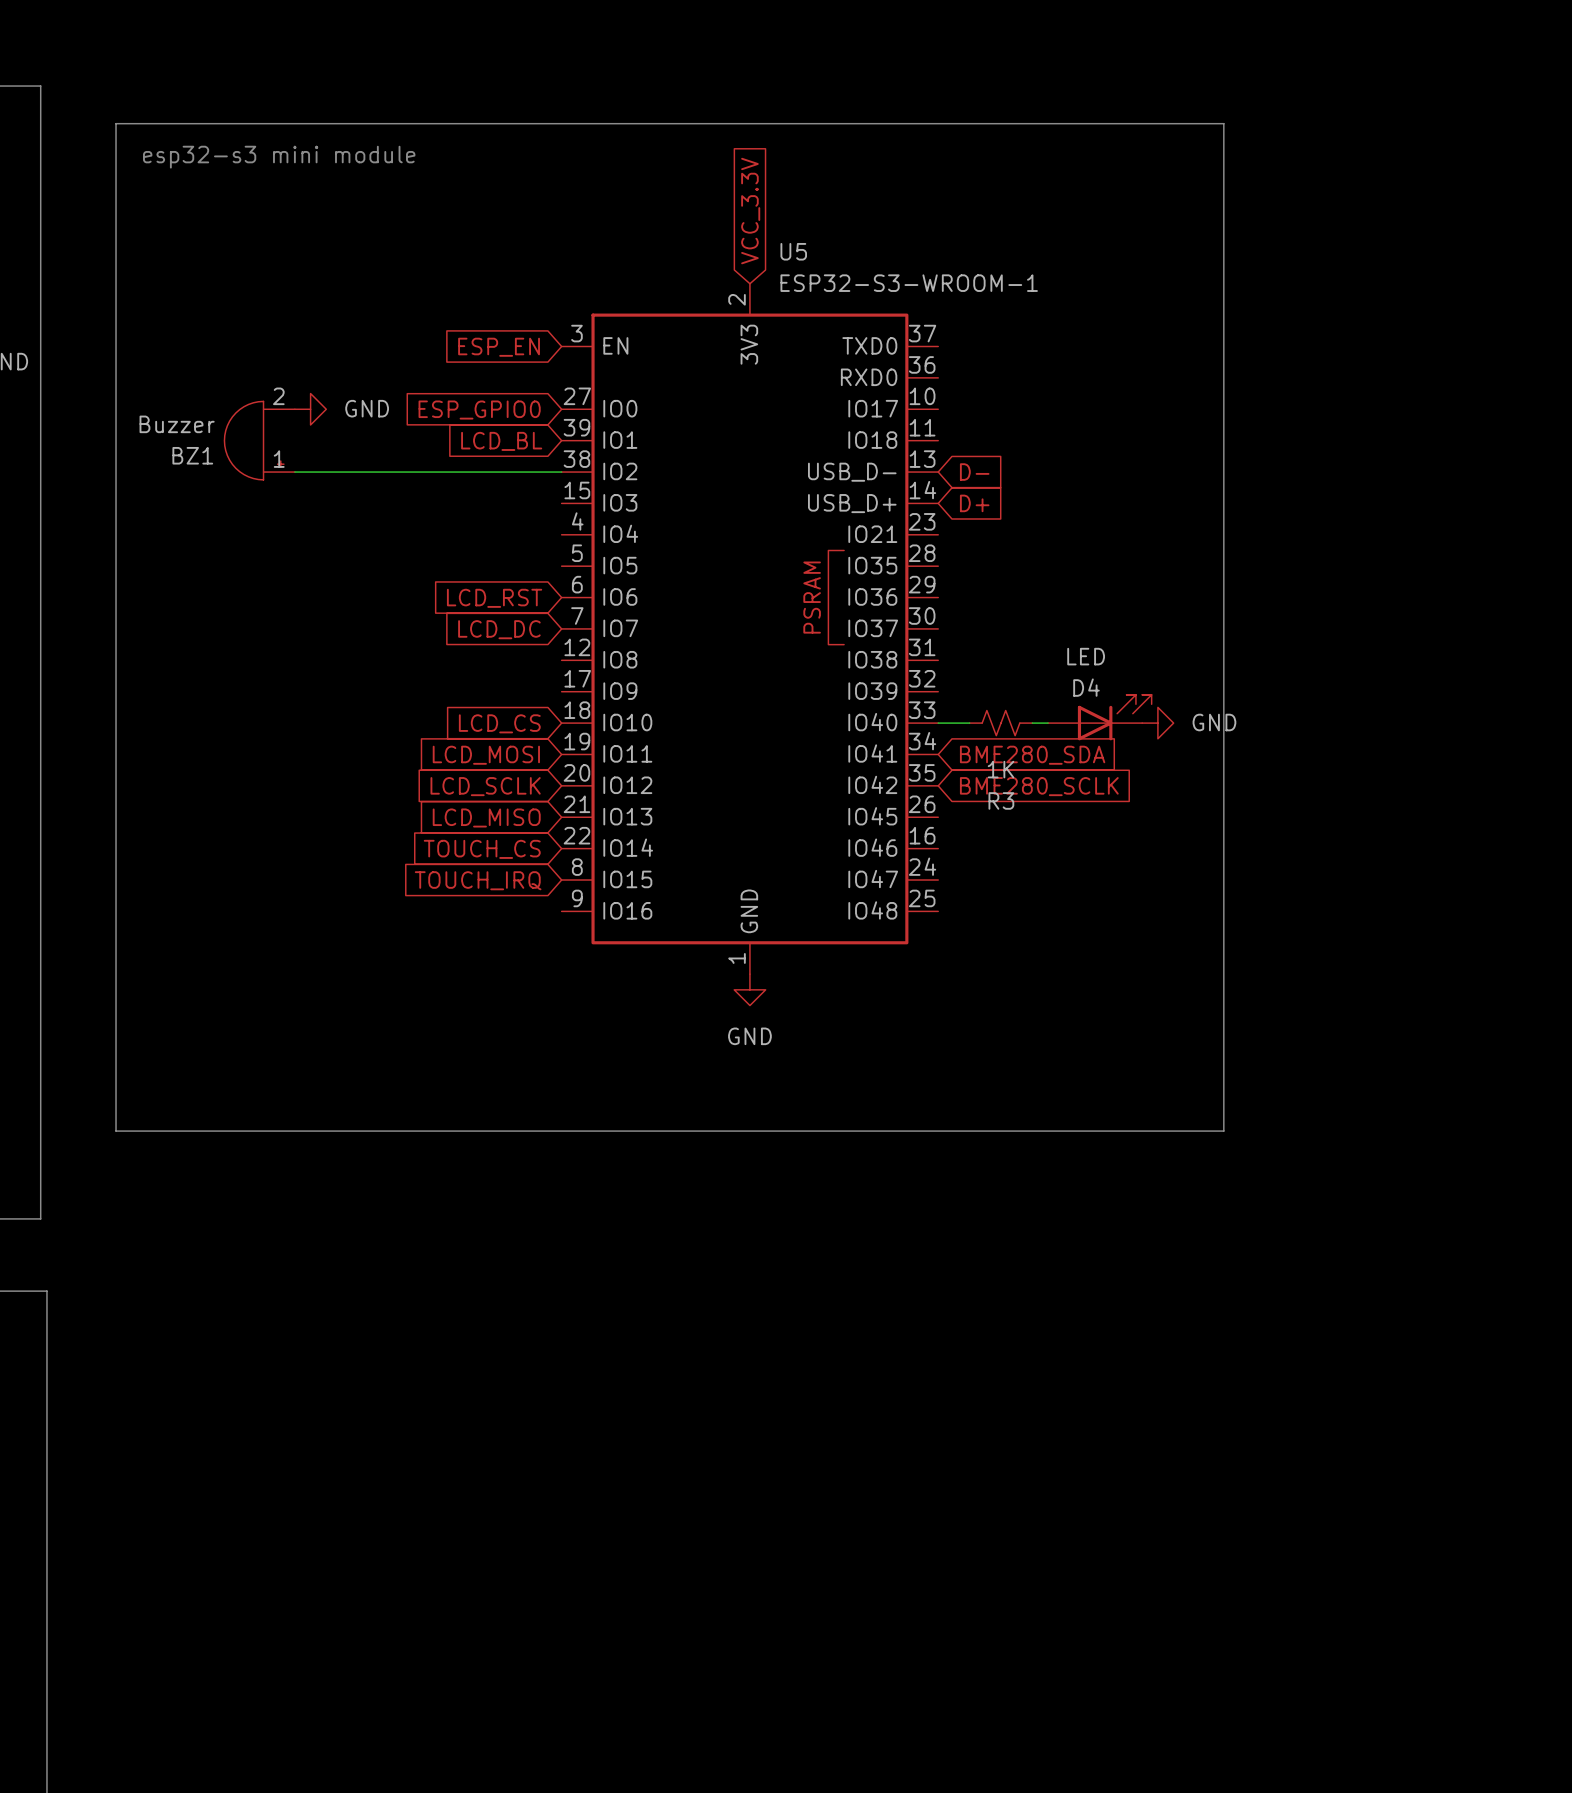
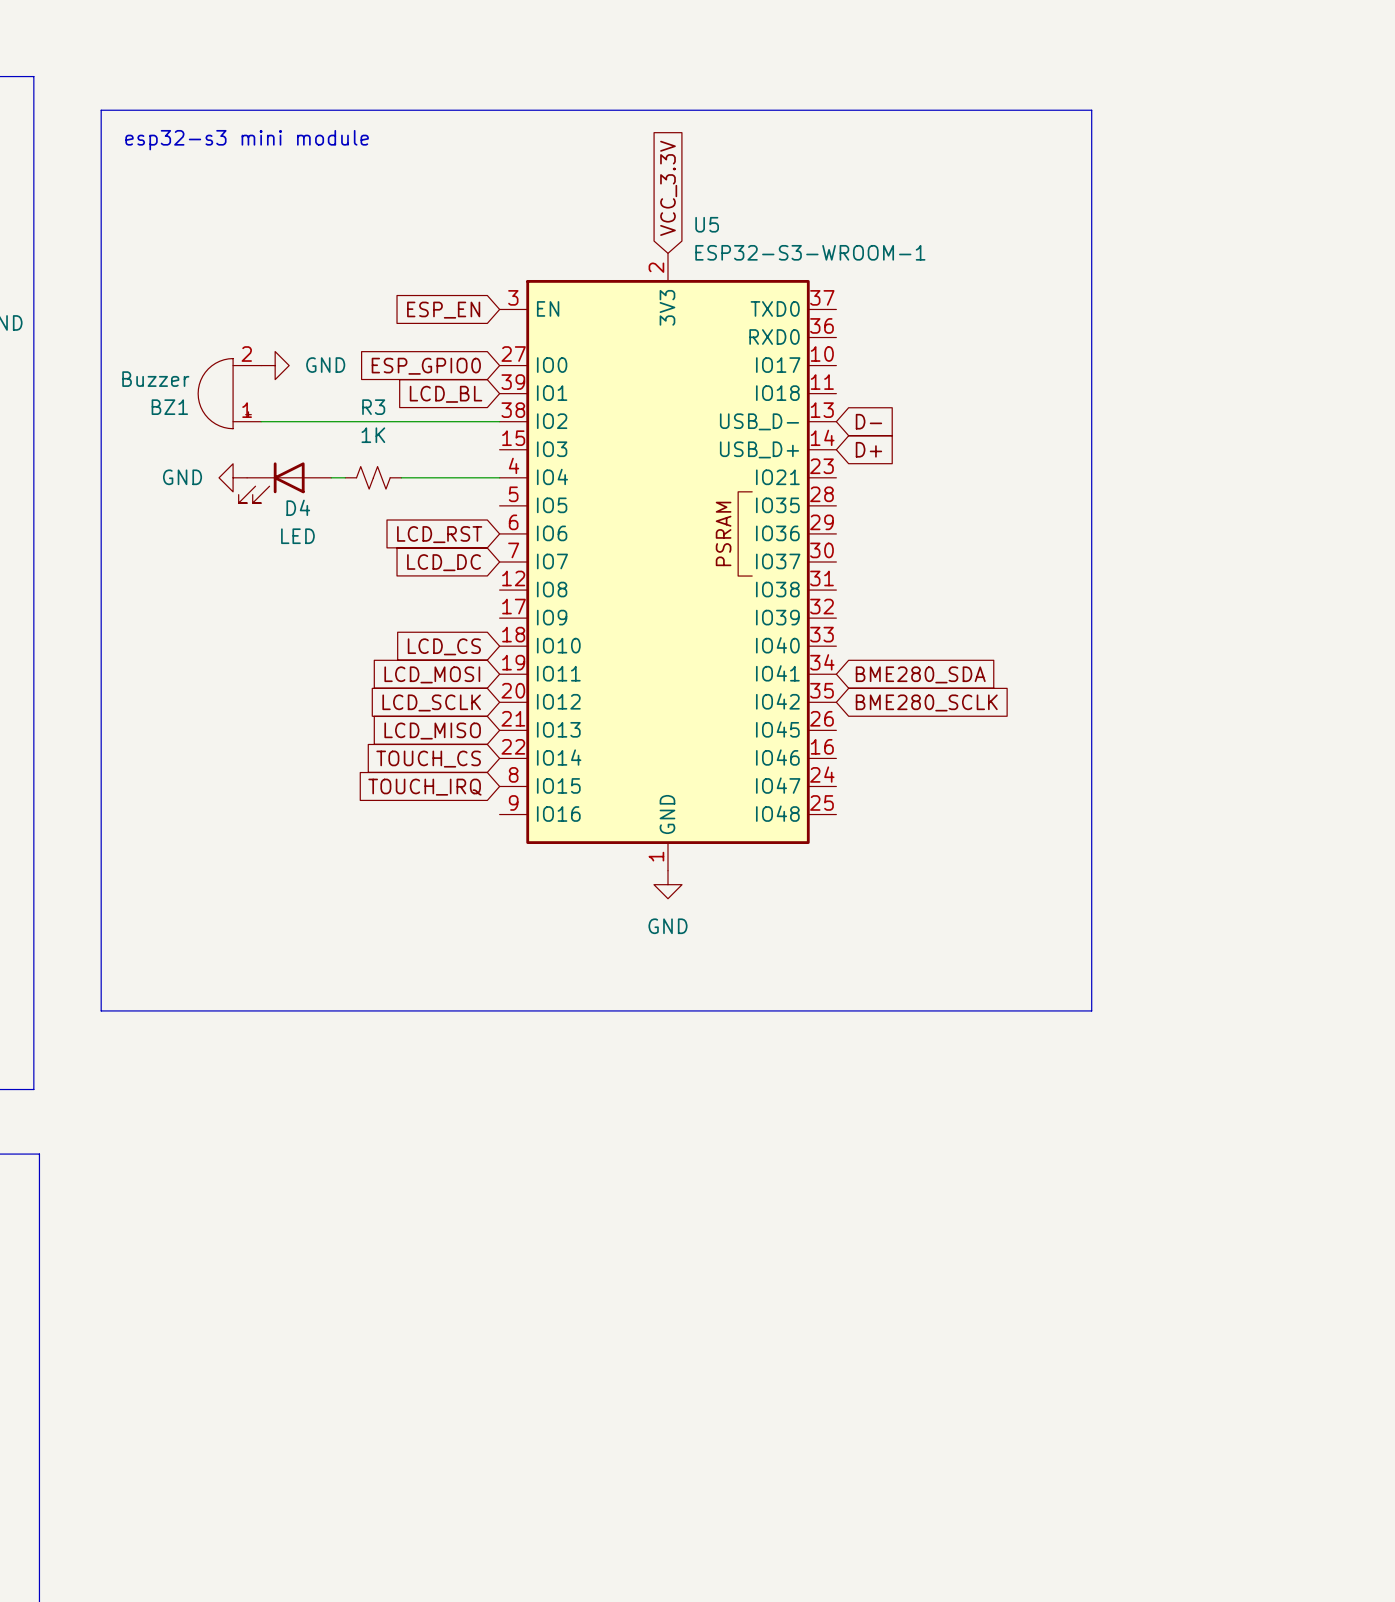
power symbol: none -> GND (233, 477)
wire: none -> (331, 477) (345, 477)
wire: none -> (401, 477) (499, 477)
D4 position: (1099, 717) -> (284, 482)
D4 rotation: 0° (1114, 717) -> 180° (271, 482)
wire: (938, 723) (969, 723) -> none
R3 position: (1001, 723) -> (373, 477)
wire: (1032, 723) (1048, 723) -> none
power symbol: GND (1157, 723) -> none
R3 value position: 1K (1001, 769) -> 1K (373, 435)
R3 name position: R3 (1001, 800) -> R3 (373, 407)

